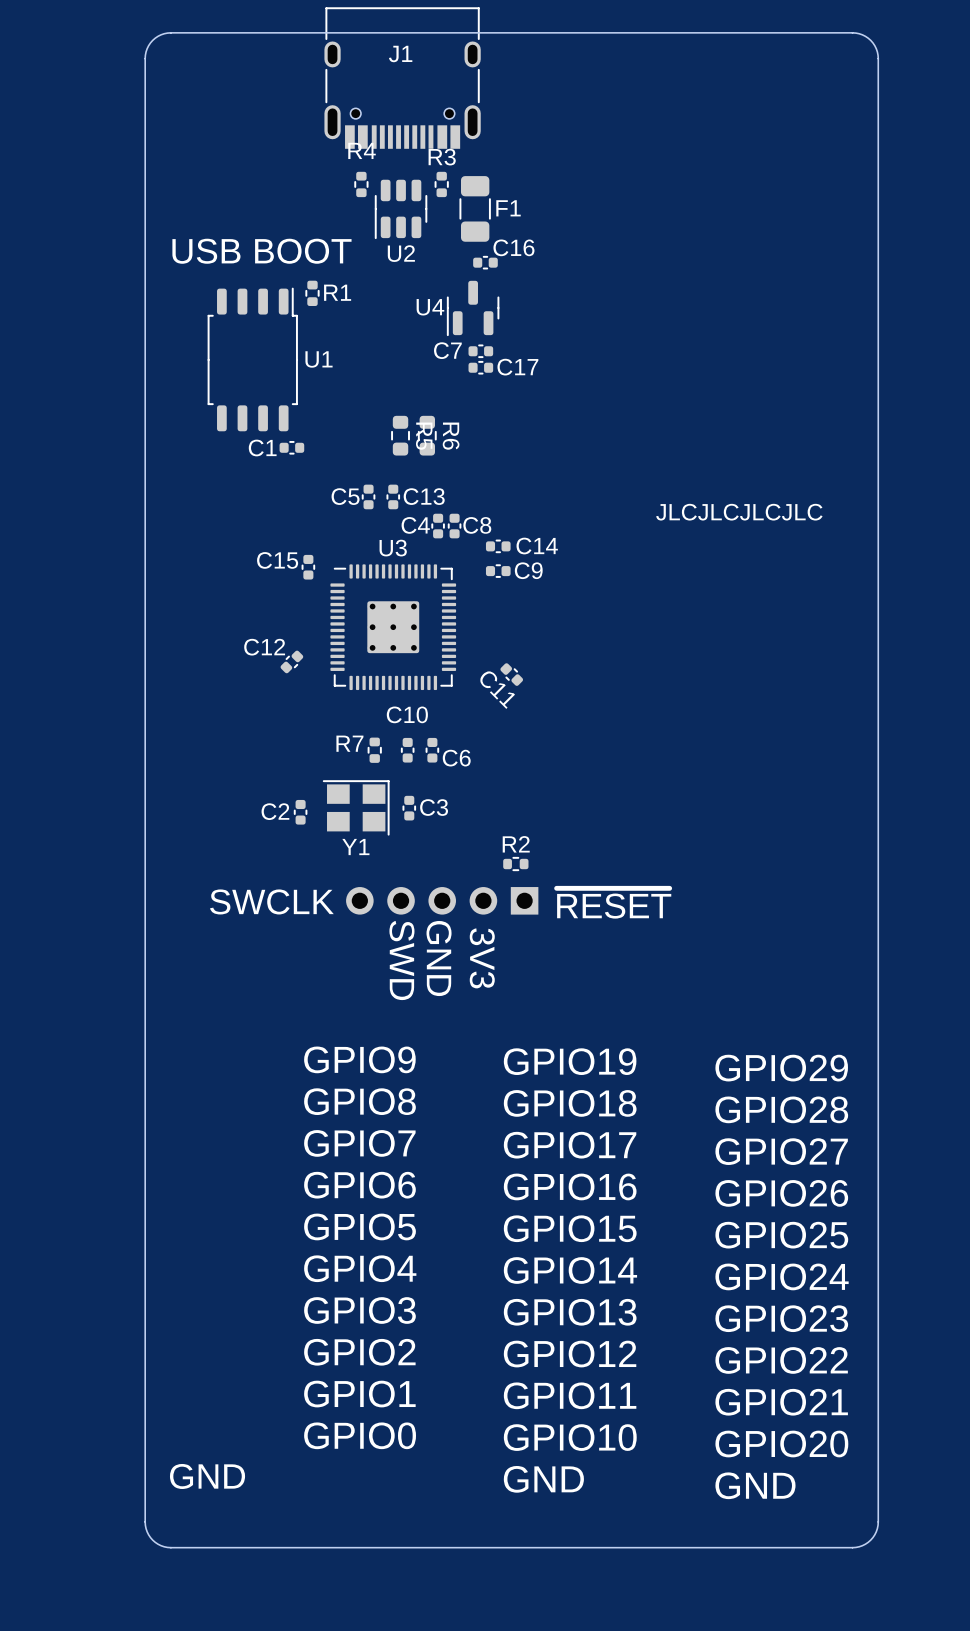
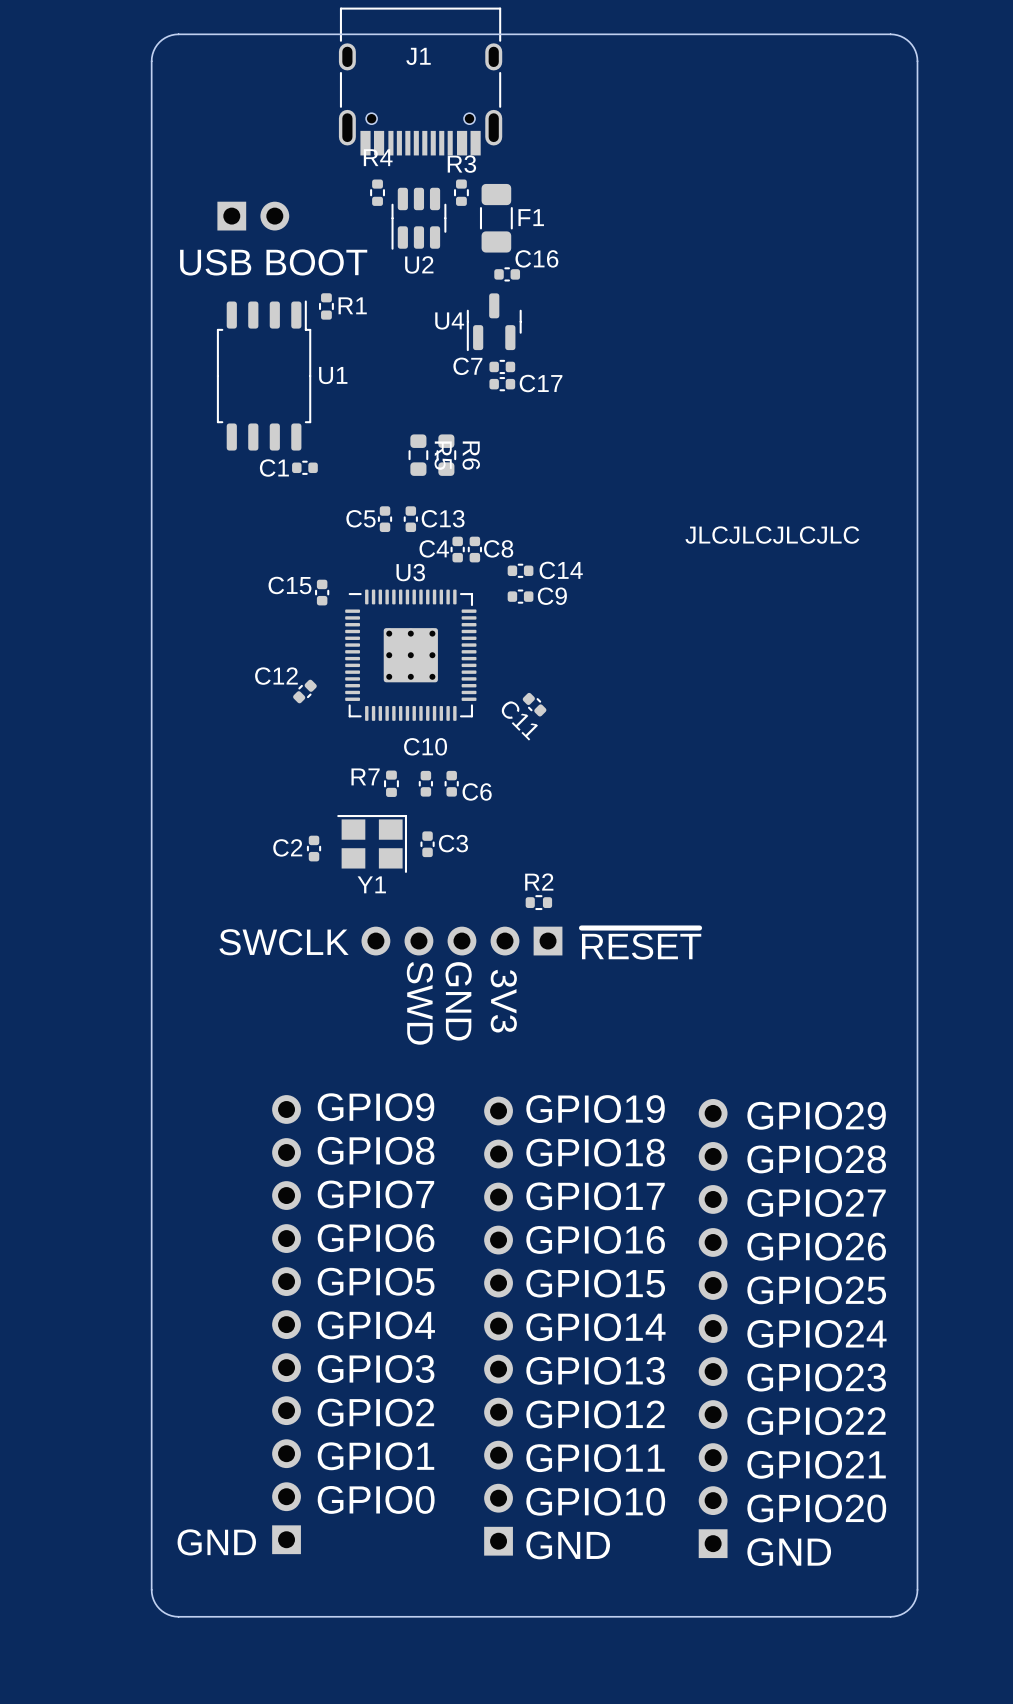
part: none -> (253, 216)
part: none -> (286, 1324)
part: none -> (498, 1326)
part: none -> (713, 1328)

